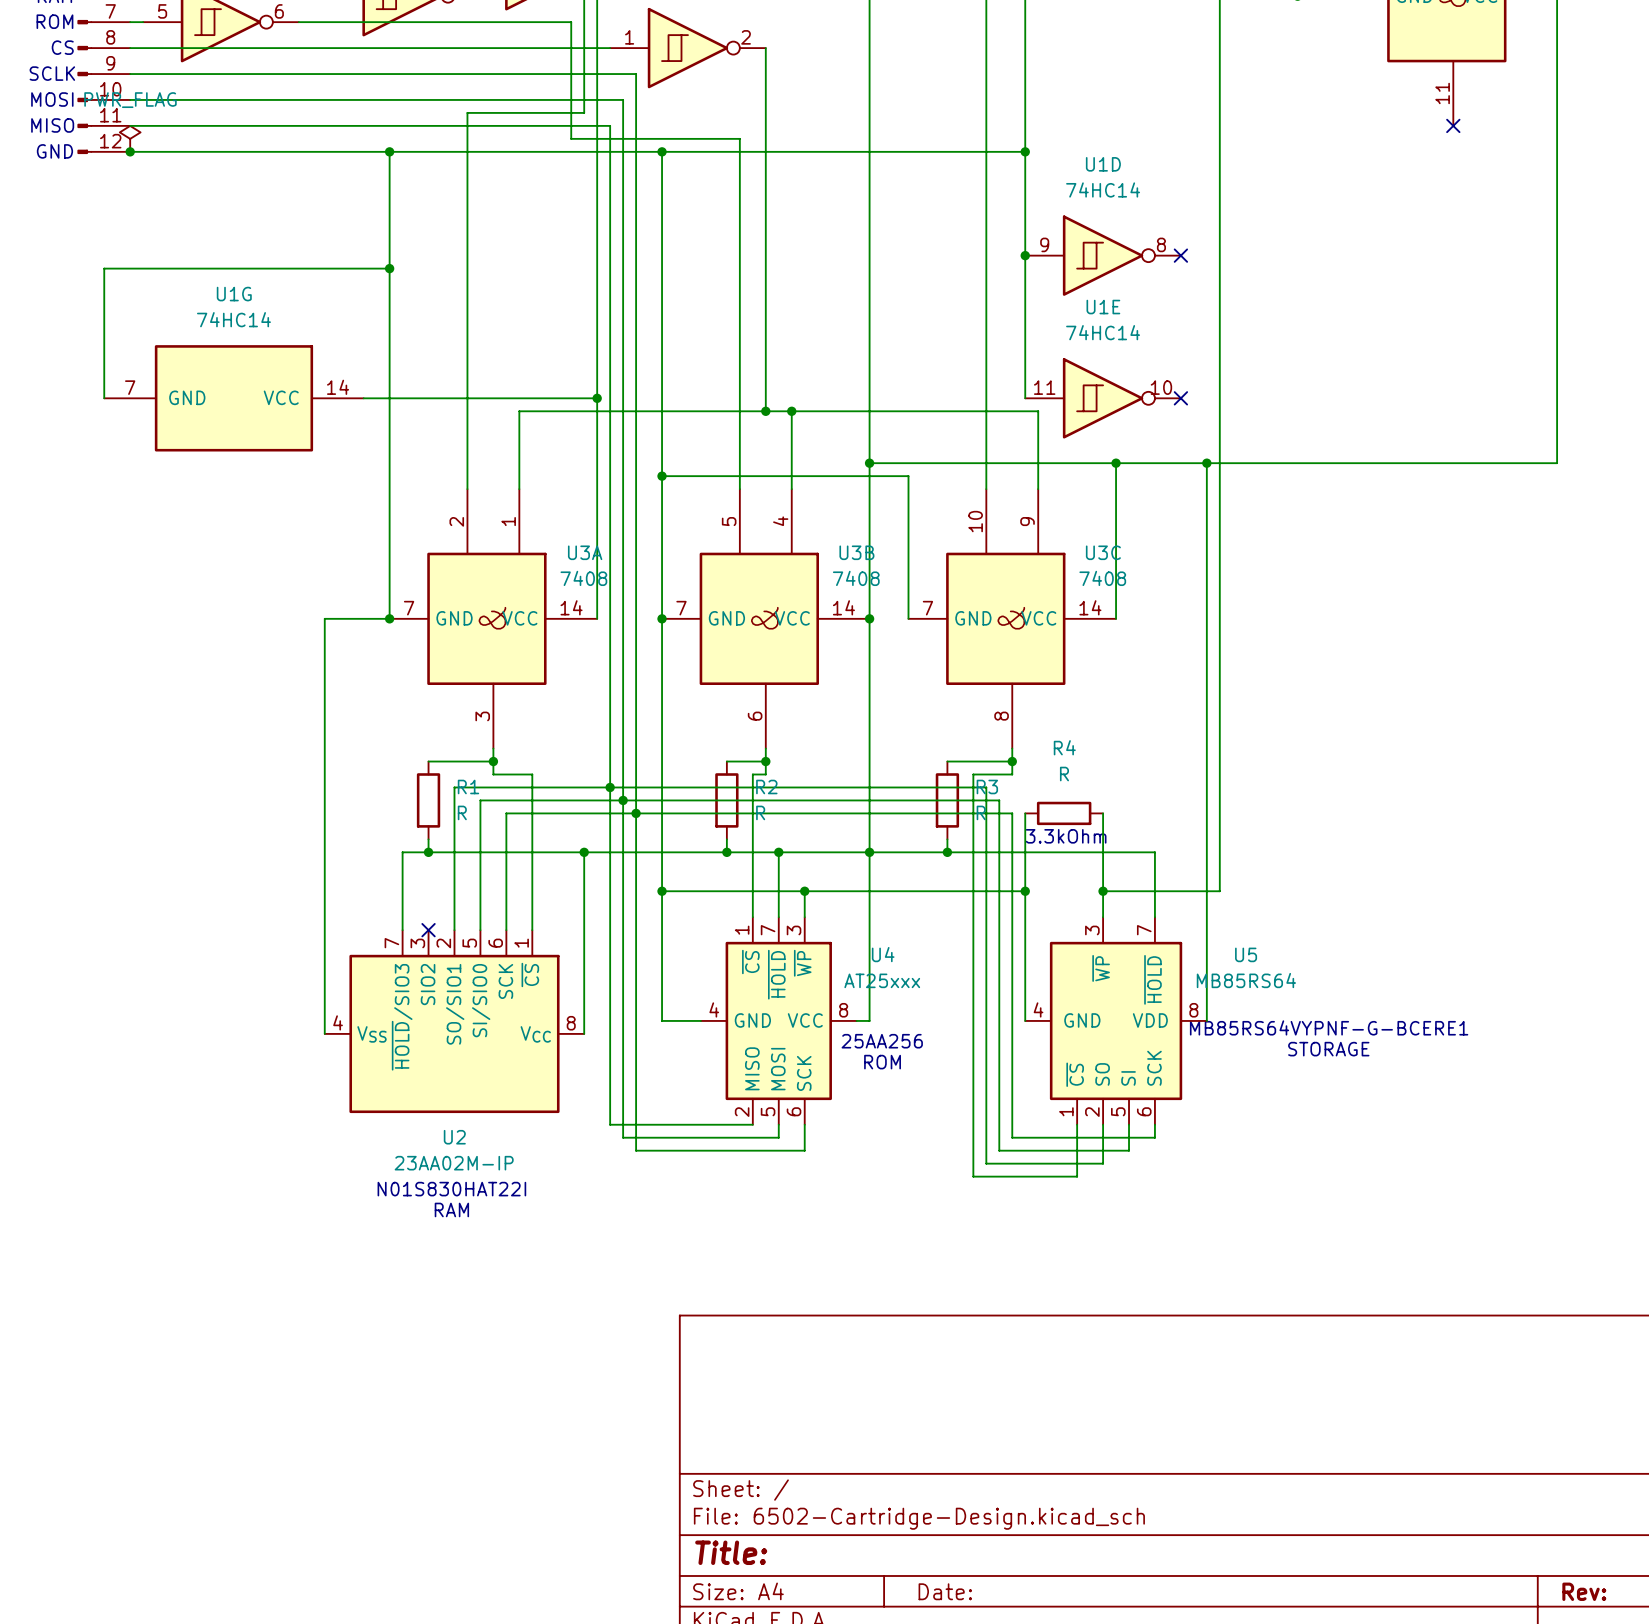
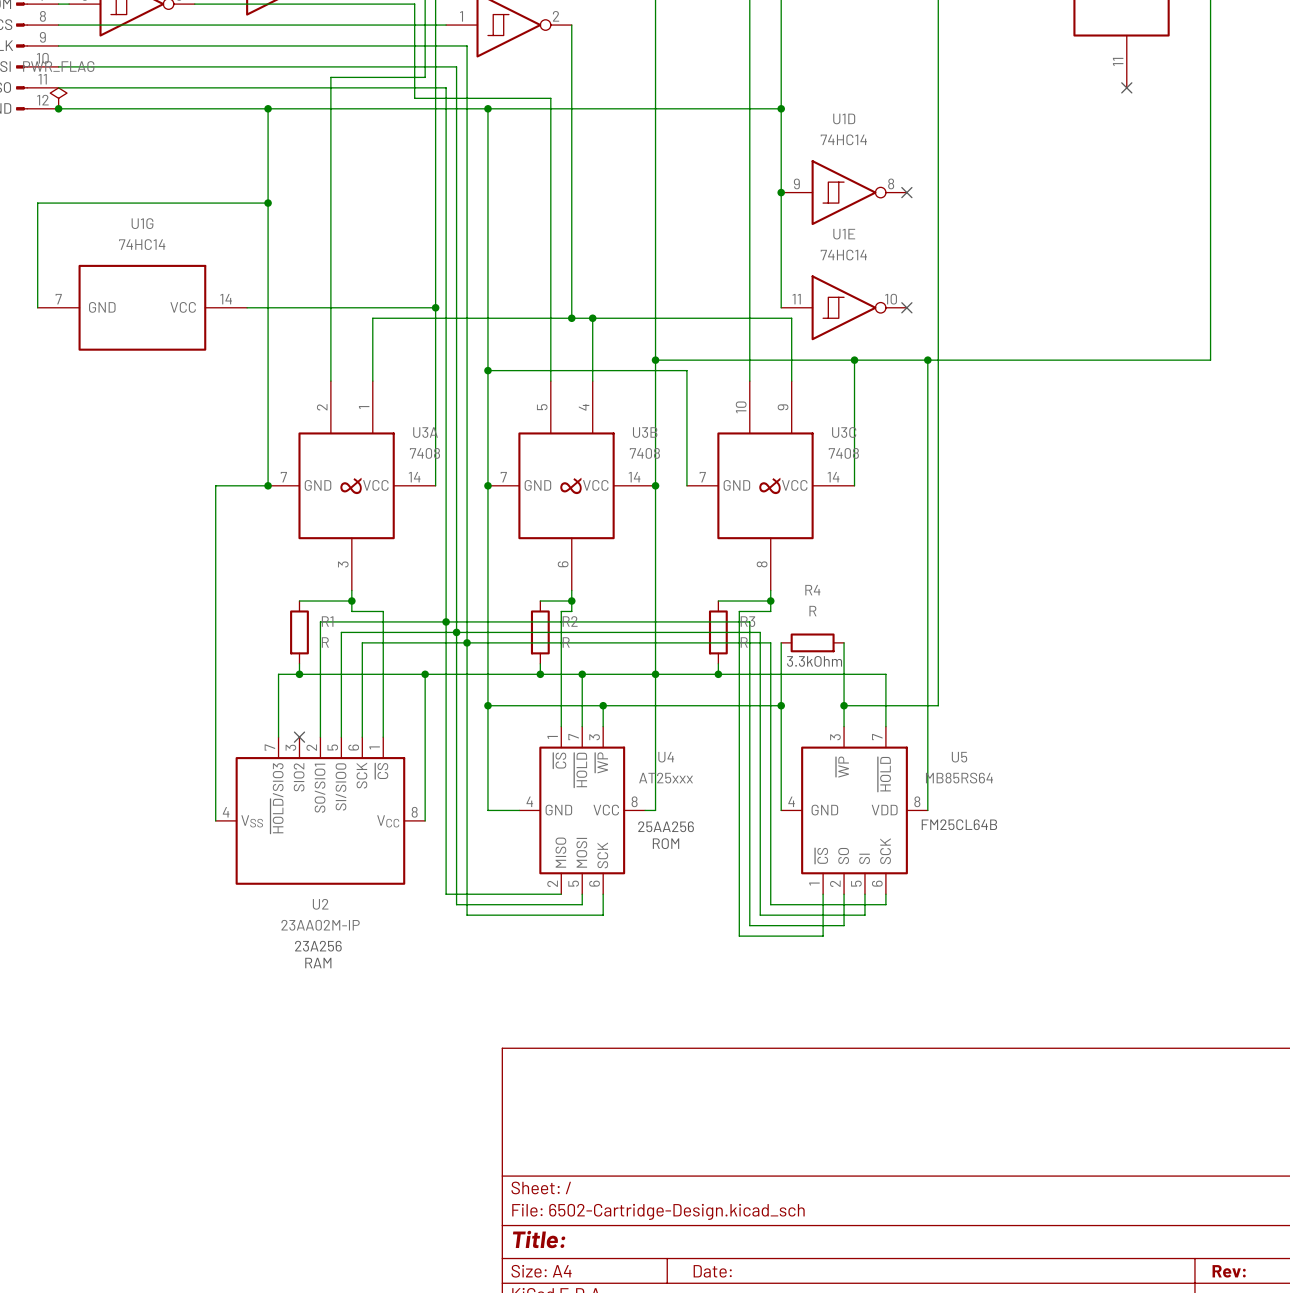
text: MB85RS64VYPNF-G-BCERE1 (1329, 1027) -> none
text: none -> FM25CL64B (959, 824)
text: STORAGE (1328, 1049) -> none
text: N01S830HAT22I (451, 1189) -> 23A256 (318, 946)

